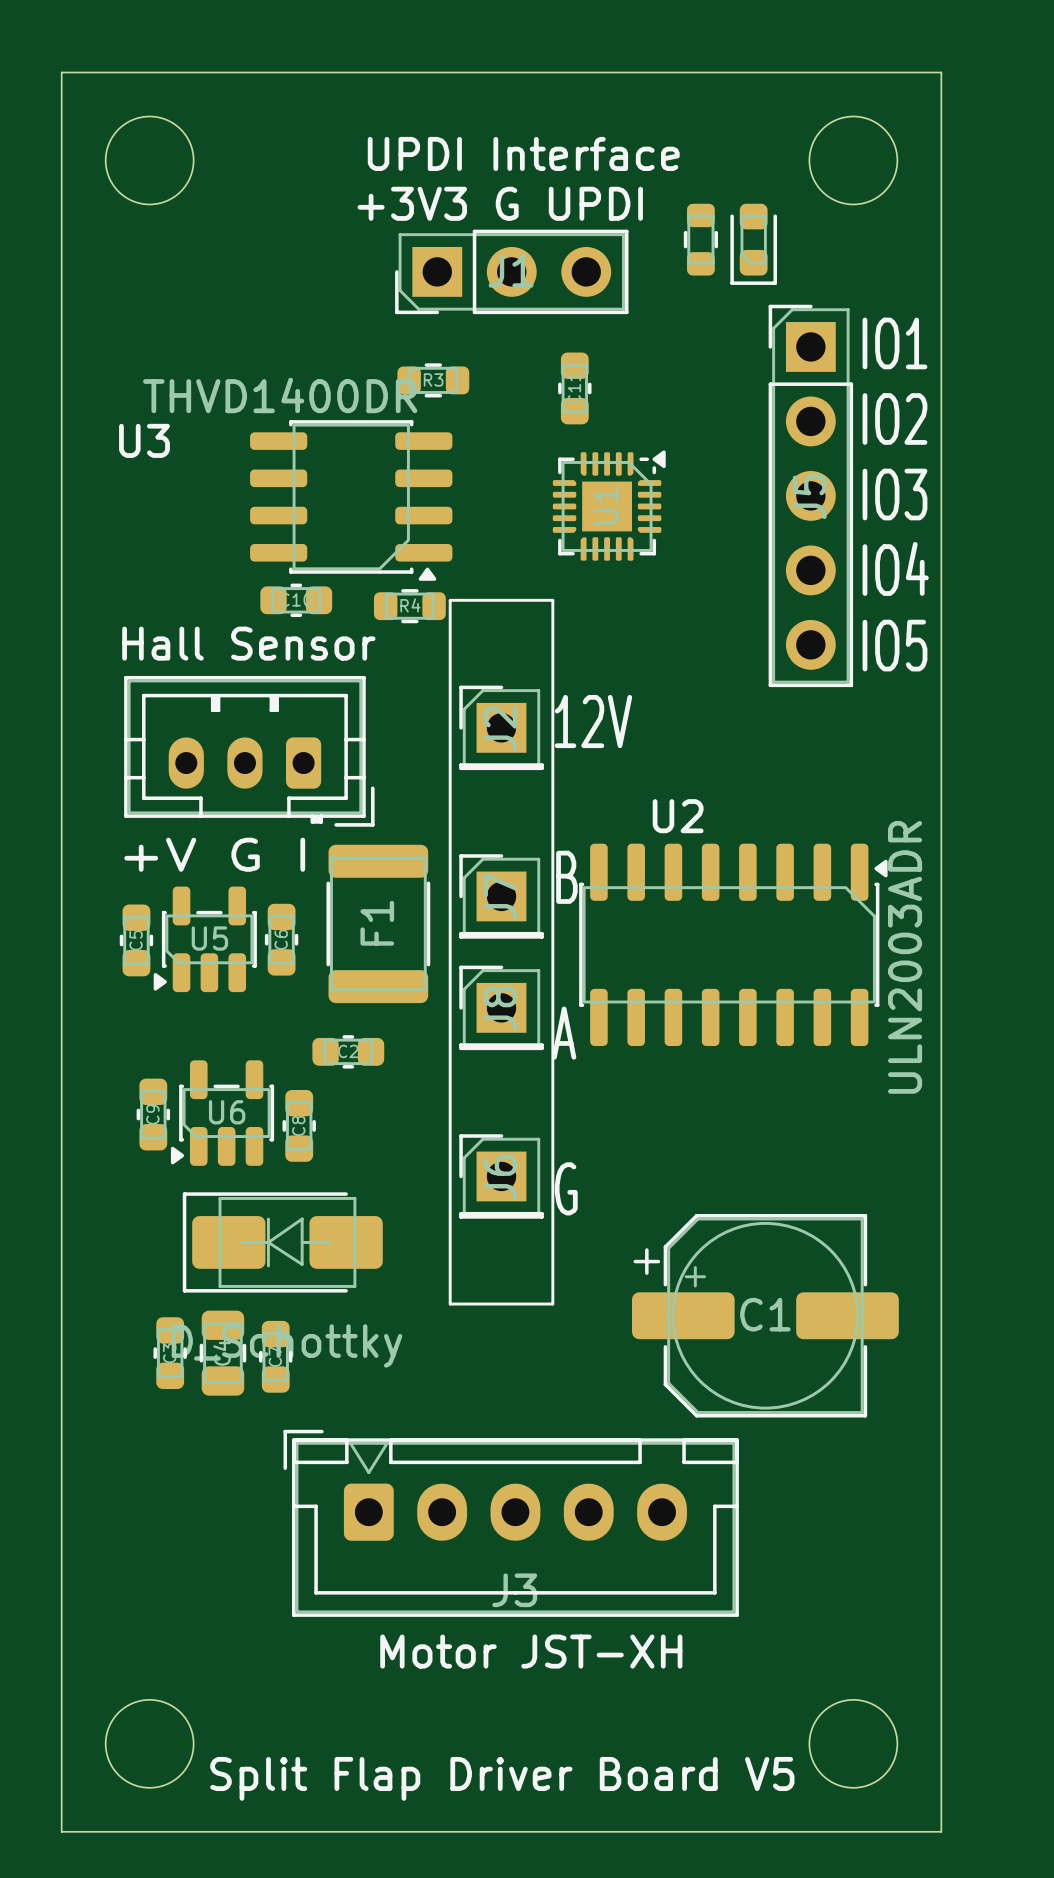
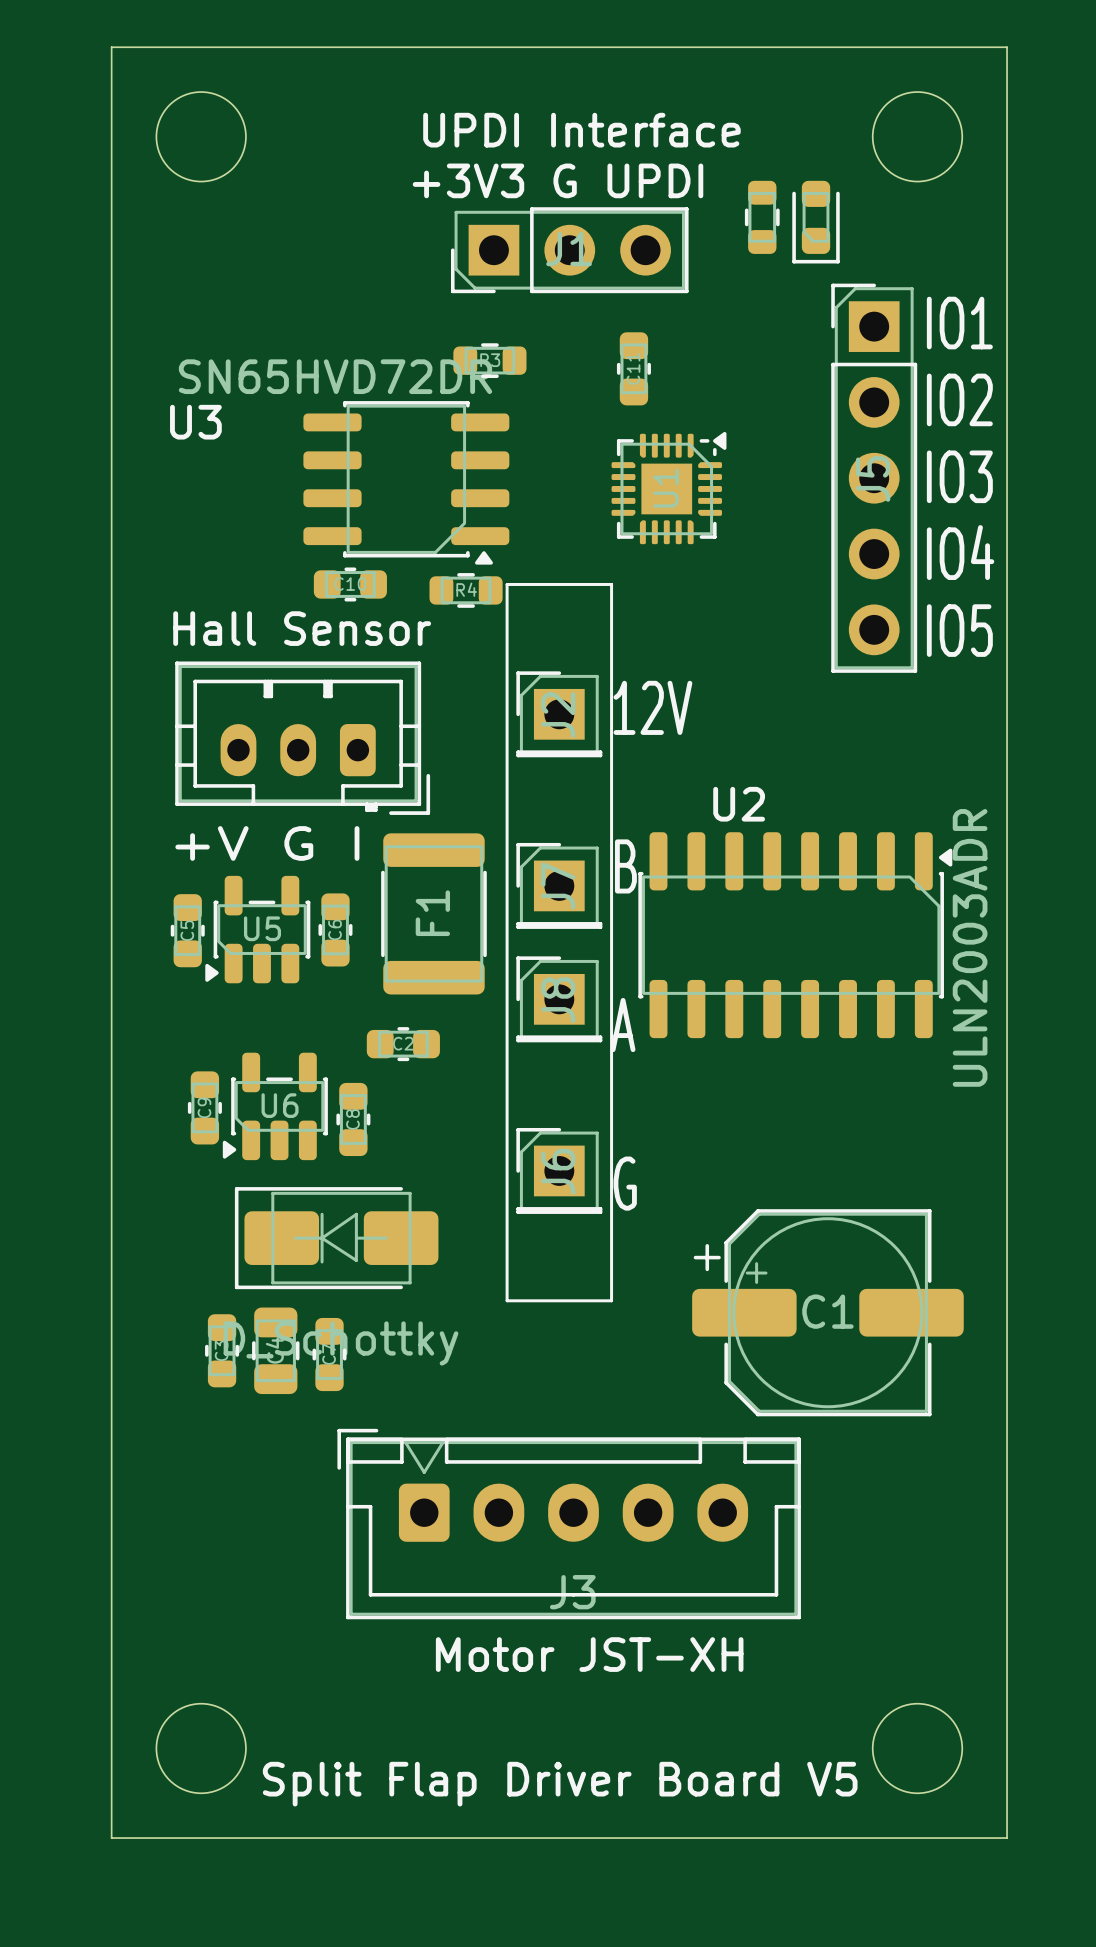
U3 value: THVD1400DR (280, 395) -> SN65HVD72DR (335, 376)

